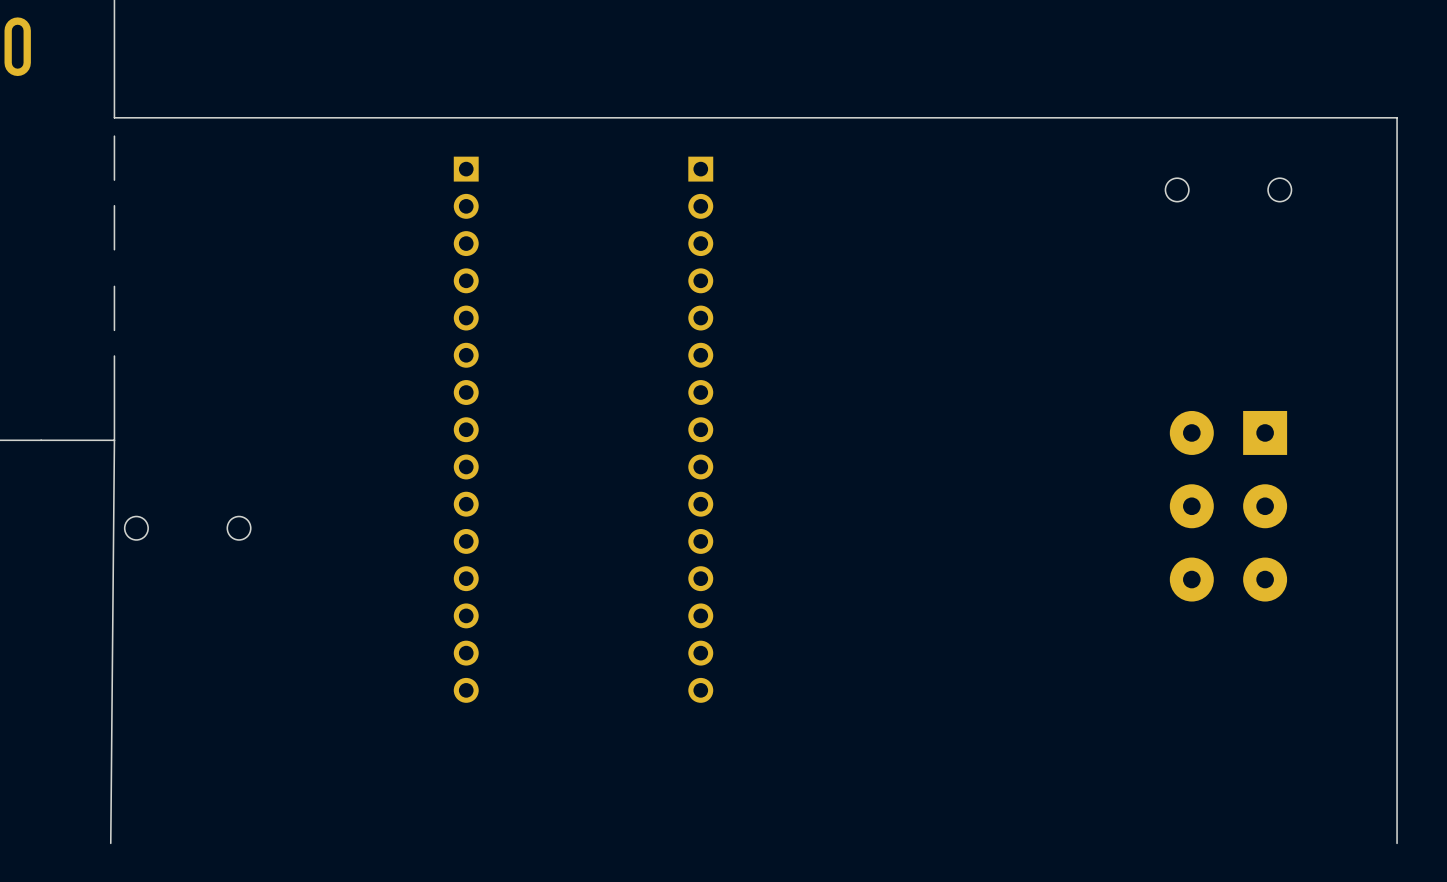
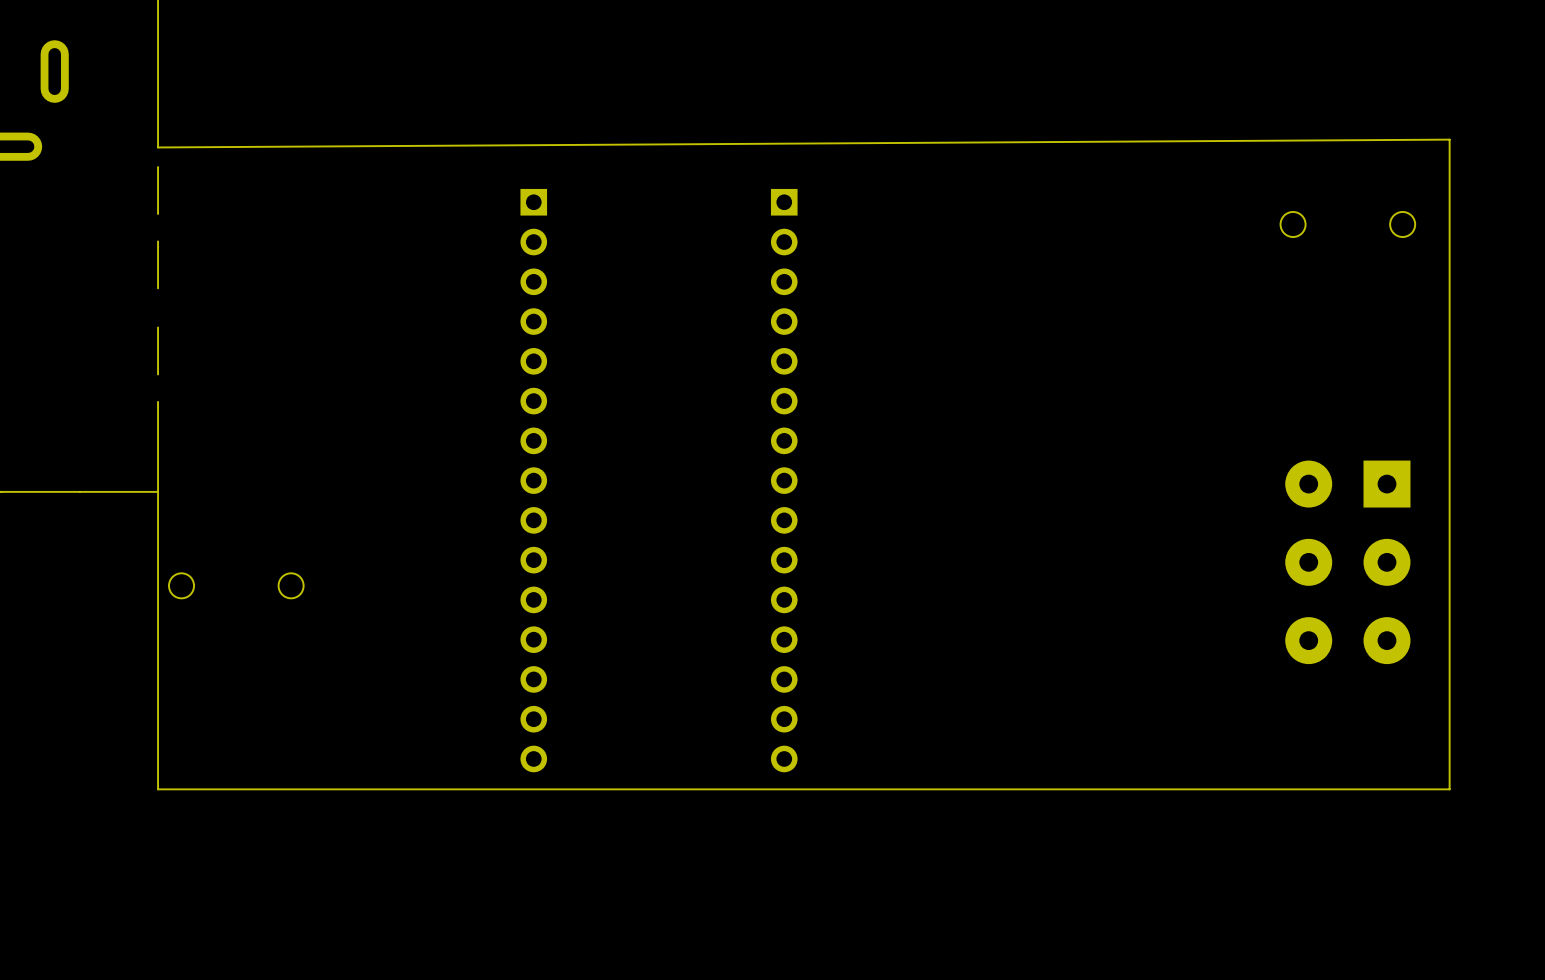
board edge: (114, 117) (1397, 117) (1397, 843) -> none
board edge: (114, 440) (110, 843) -> (158, 491) (158, 789) (1449, 789) (1449, 139) (158, 147)

